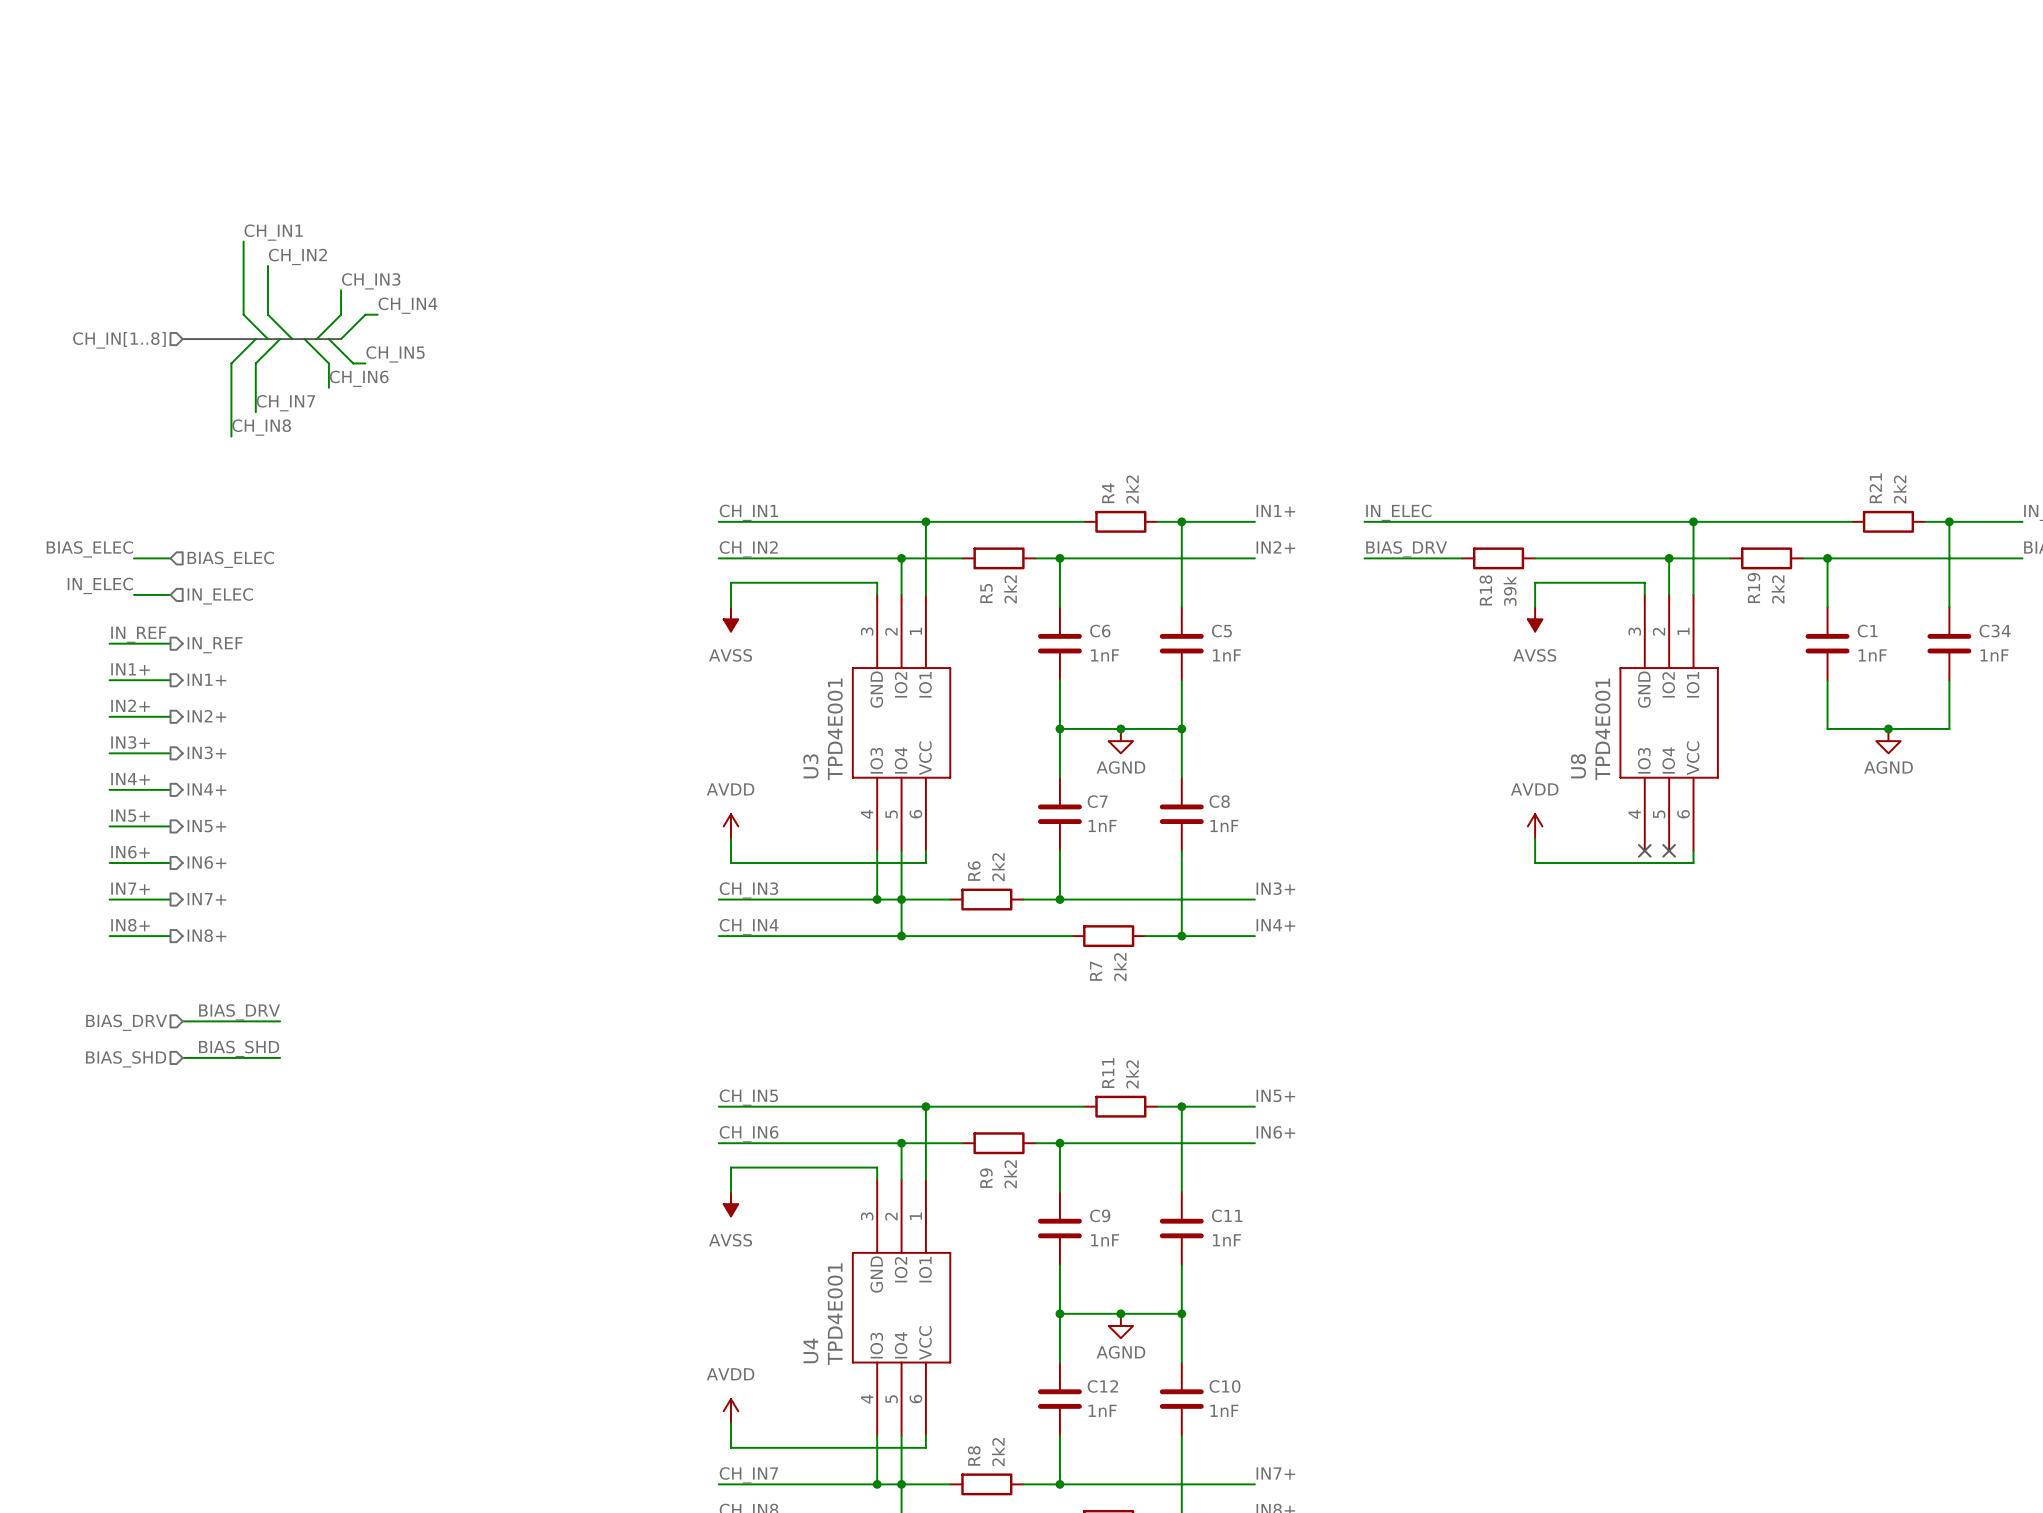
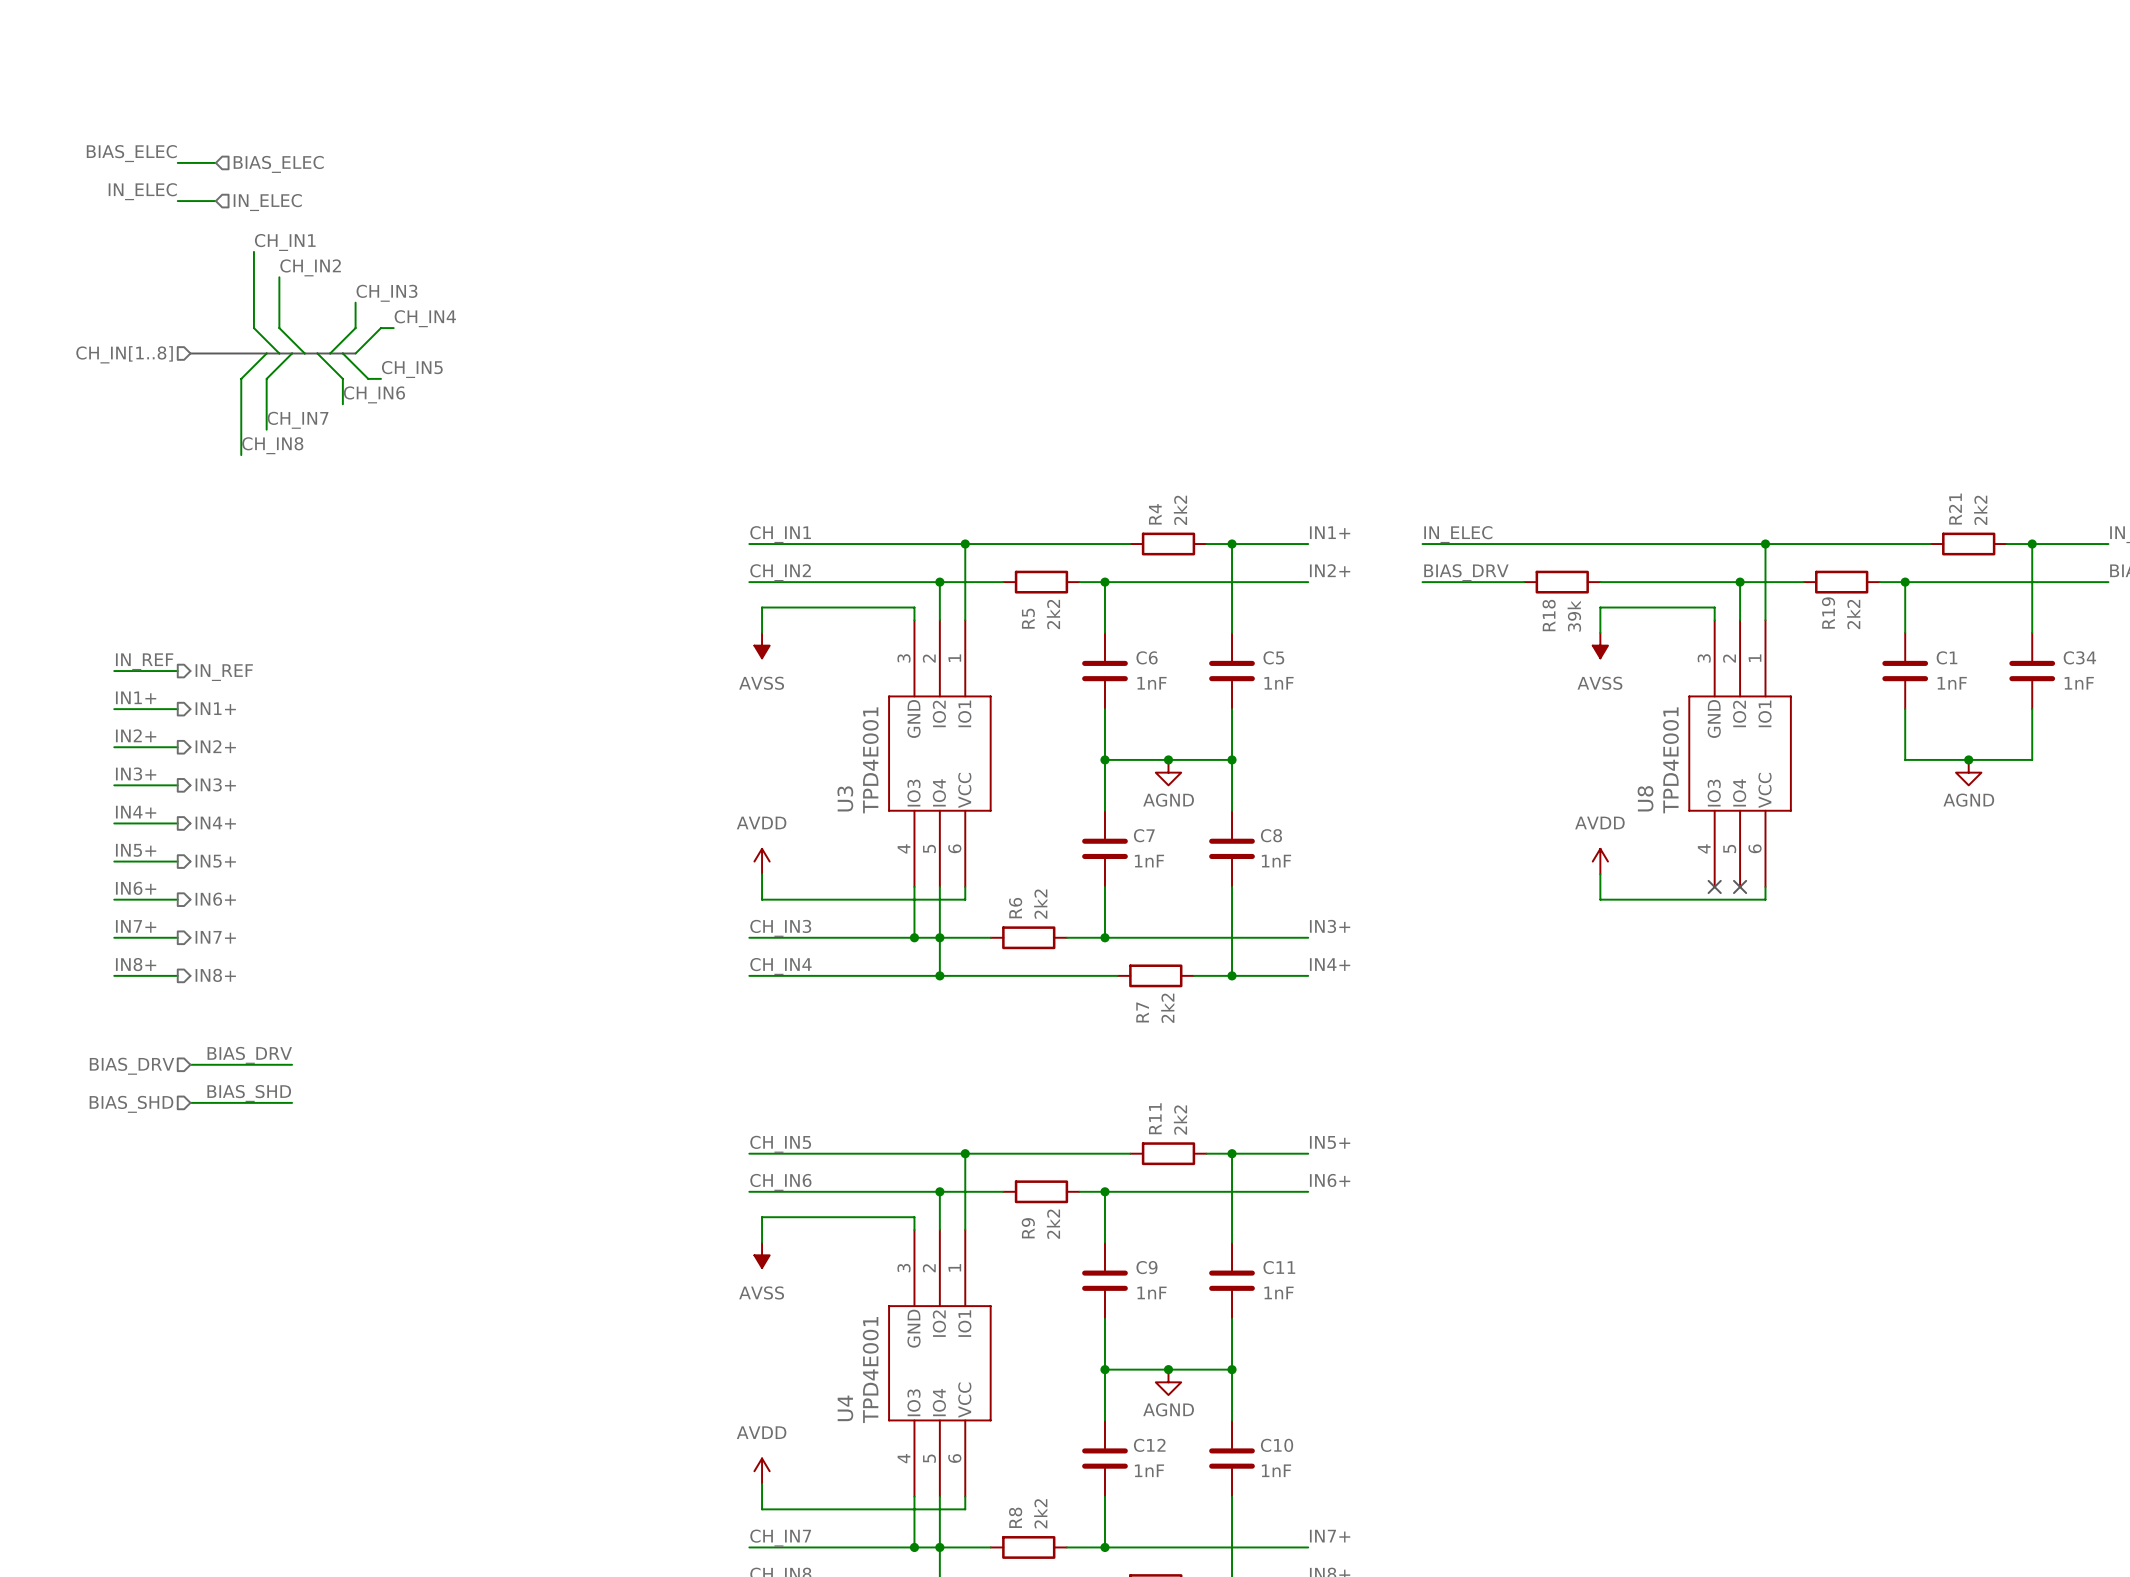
label: none -> BIAS_ELEC (131, 153)
wire: none -> (177, 162) (215, 162)
hierarchical label: none -> BIAS_ELEC (278, 164)
label: none -> IN_ELEC (142, 191)
wire: none -> (177, 201) (215, 201)
hierarchical label: none -> IN_ELEC (267, 202)
label: BIAS_ELEC (89, 549) -> none
wire: (133, 558) (170, 558) -> none
hierarchical label: BIAS_ELEC (230, 559) -> none
label: IN_ELEC (100, 585) -> none
wire: (133, 594) (170, 594) -> none
hierarchical label: IN_ELEC (220, 596) -> none

